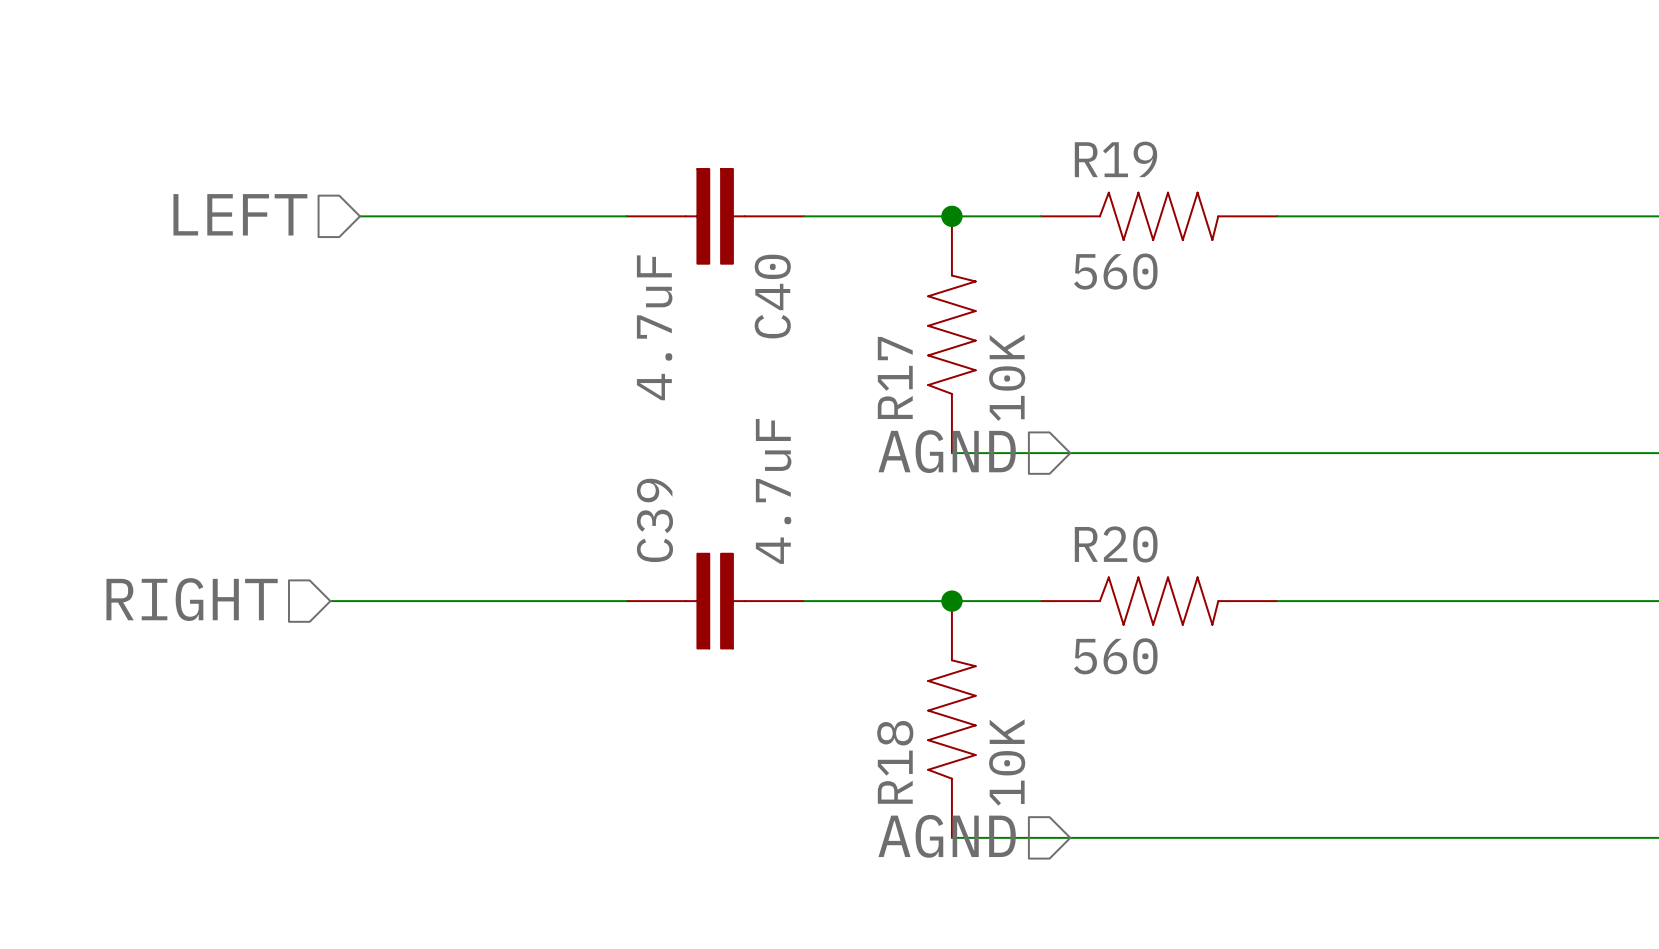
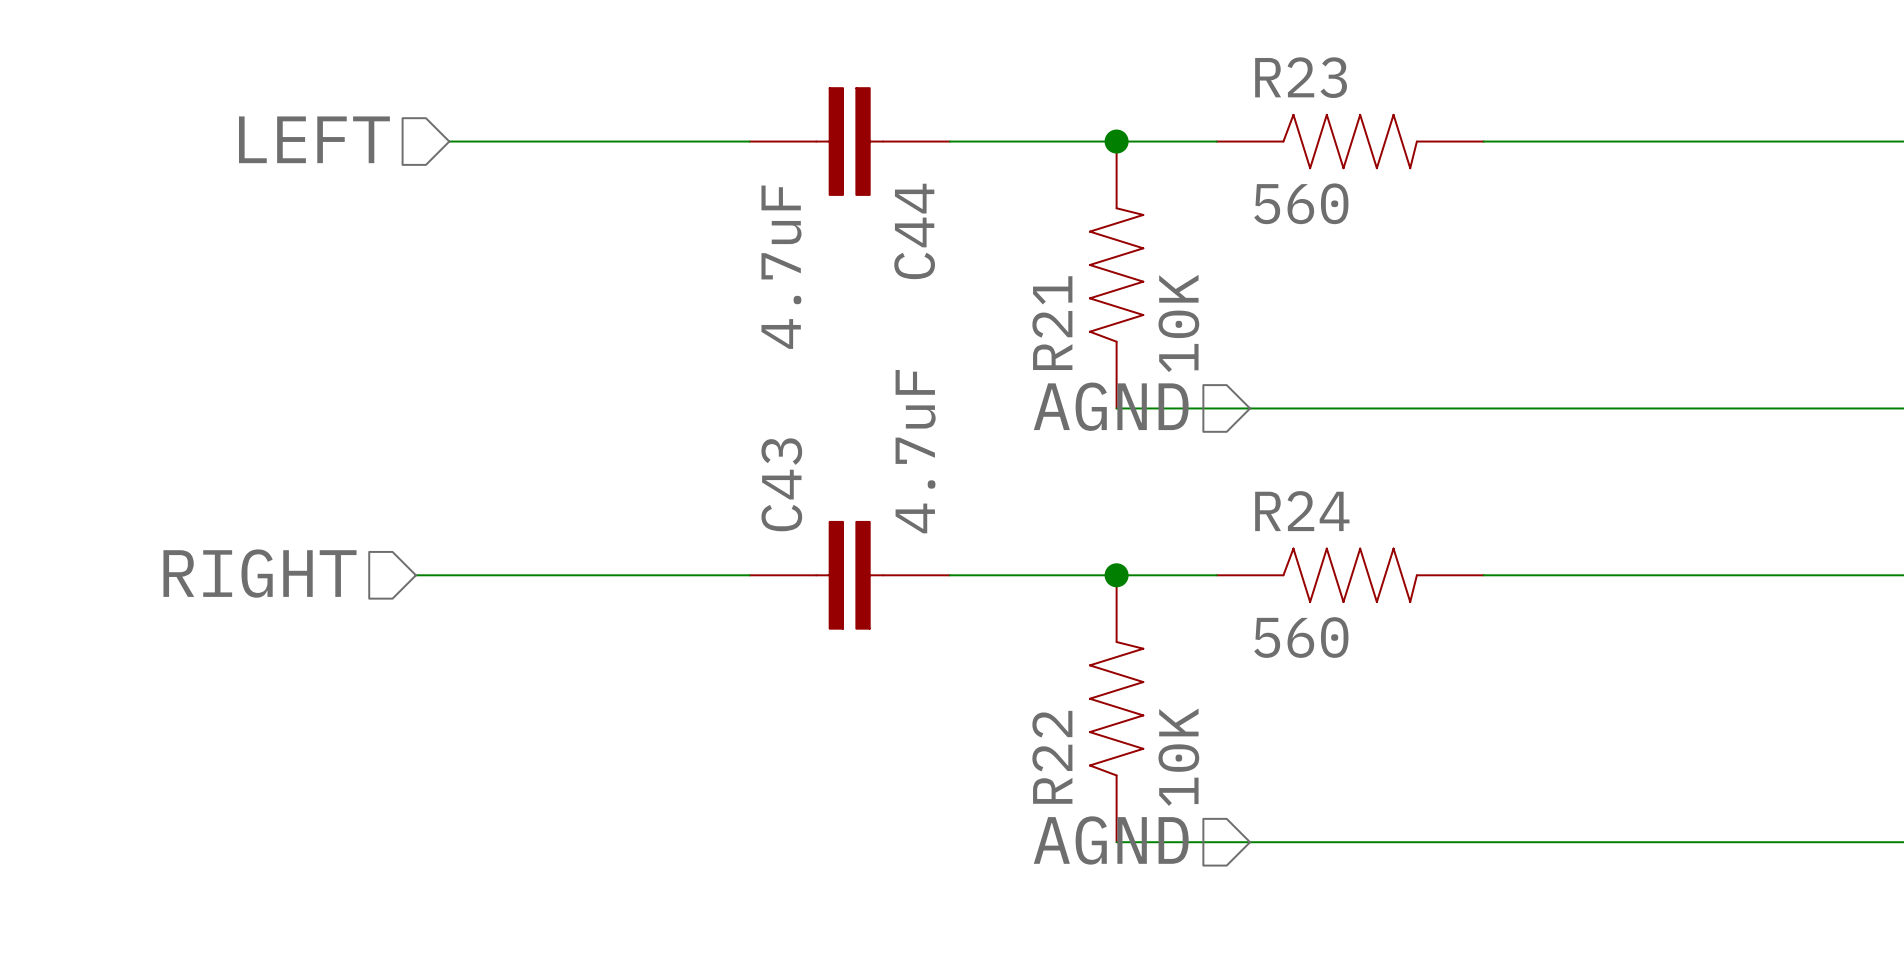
R19 name: R19 (1116, 159) -> R23 (1301, 77)
C40 name: C40 (772, 296) -> C44 (914, 231)
R17 name: R17 (895, 377) -> R21 (1052, 323)
C39 name: C39 (654, 520) -> C43 (781, 484)
R20 name: R20 (1116, 544) -> R24 (1302, 511)
R18 name: R18 (895, 762) -> R22 (1052, 757)

